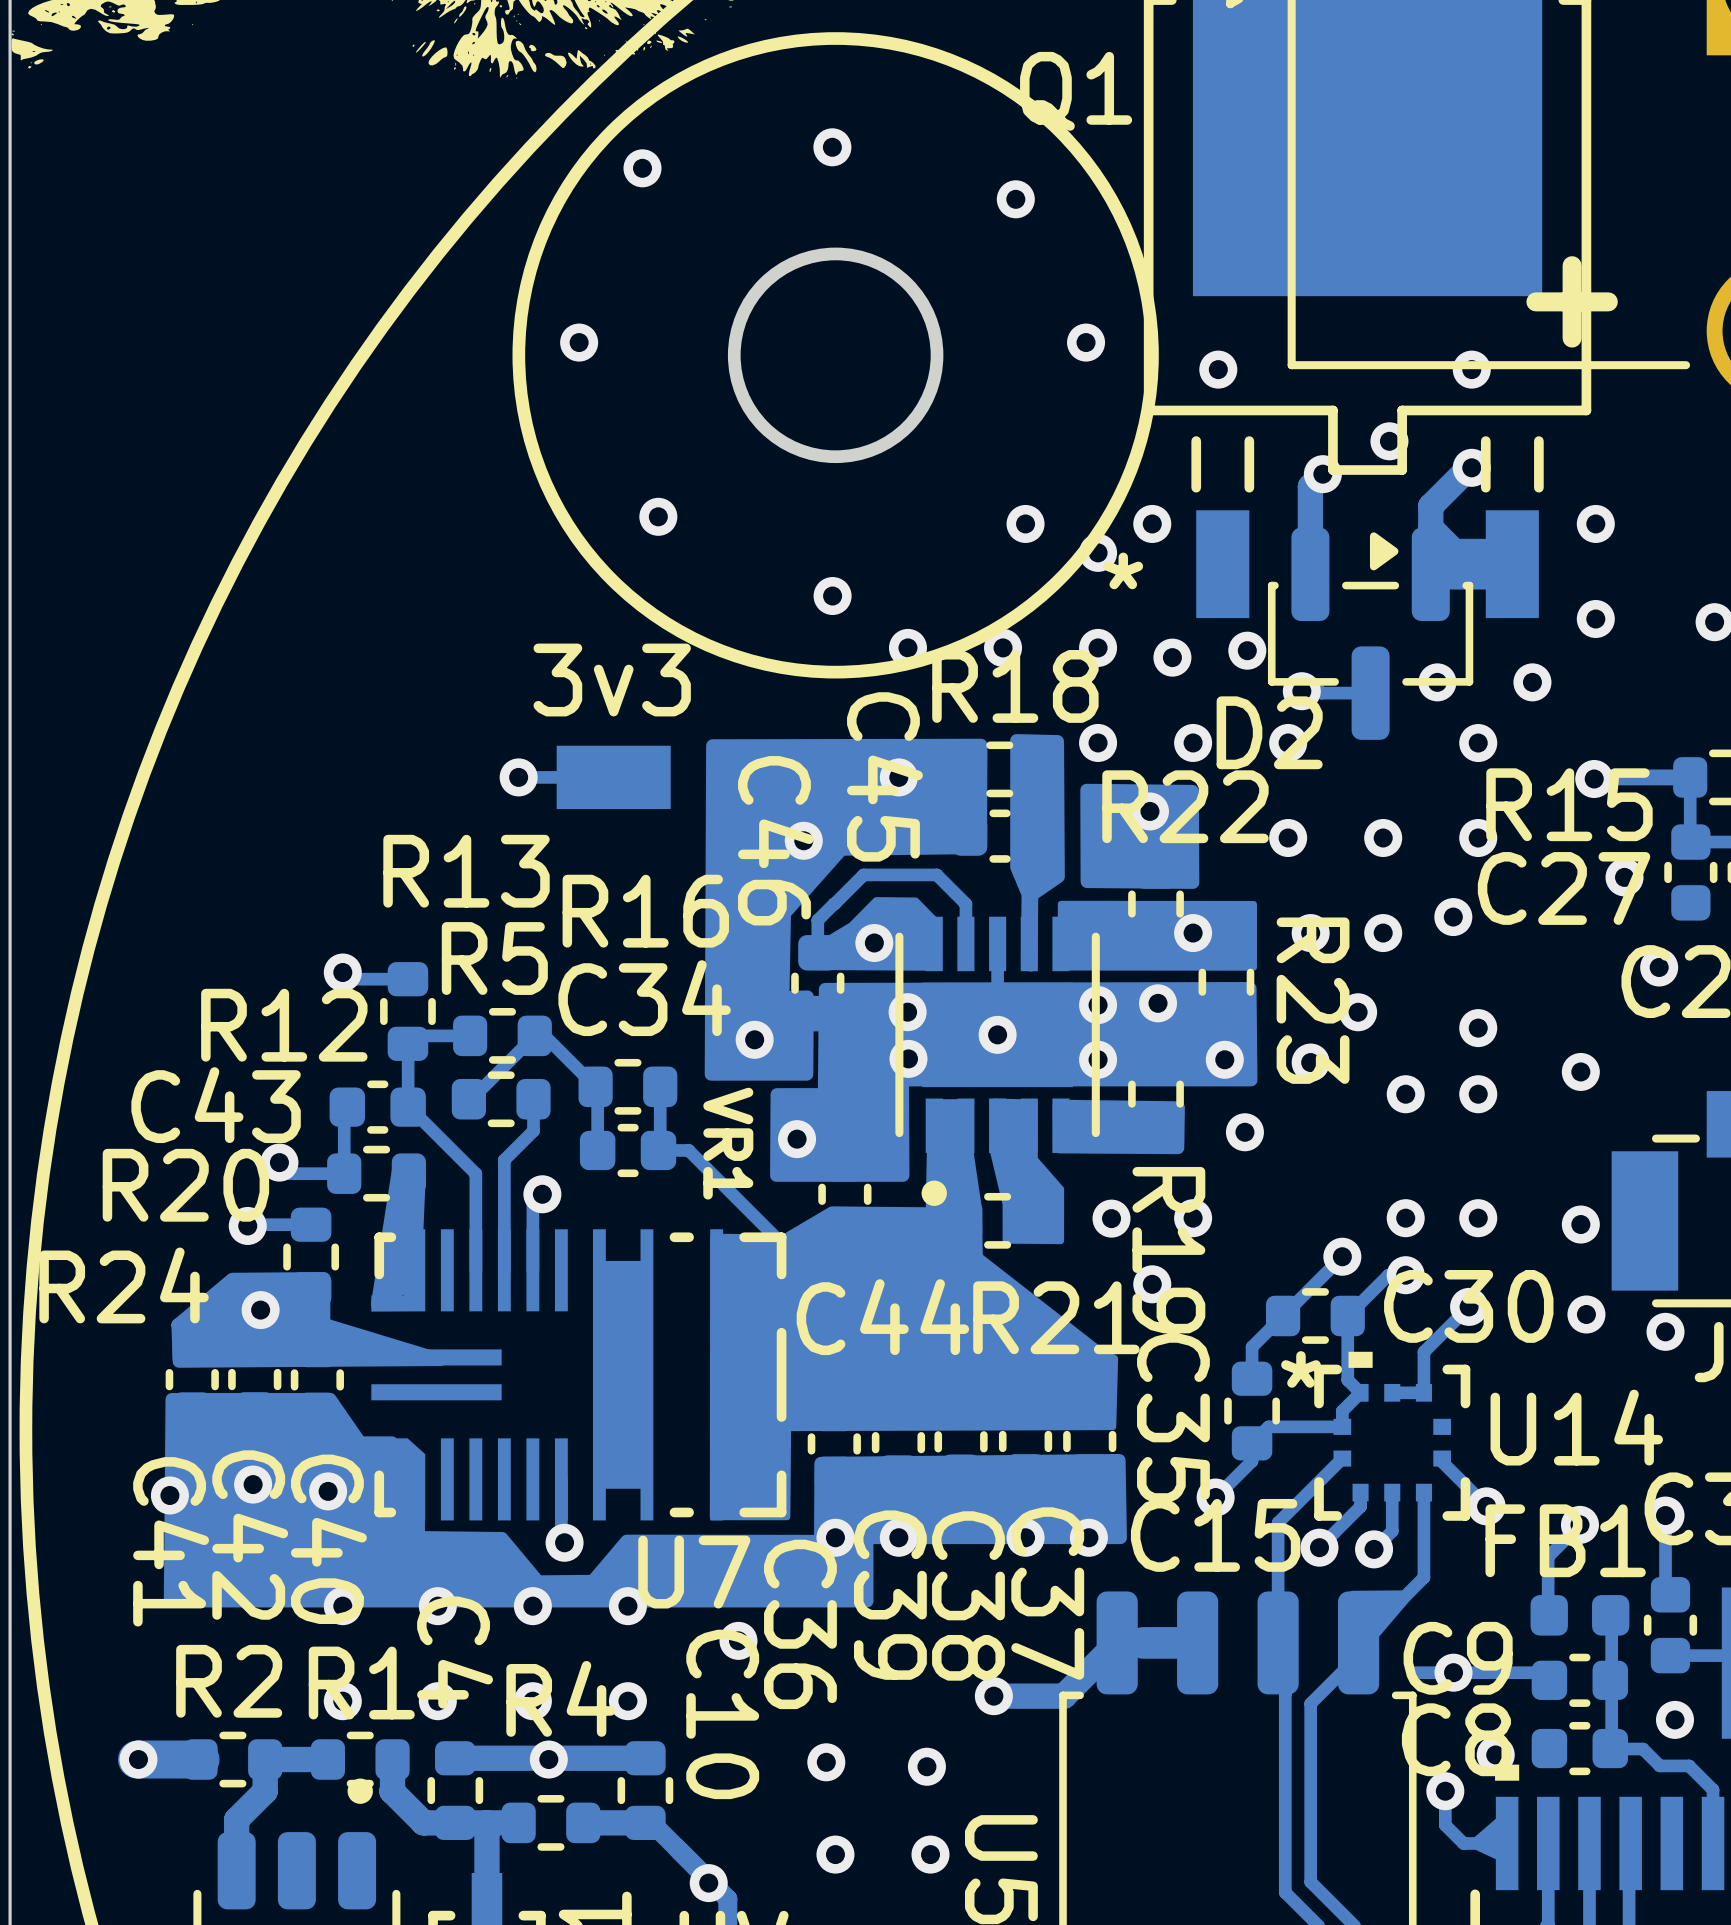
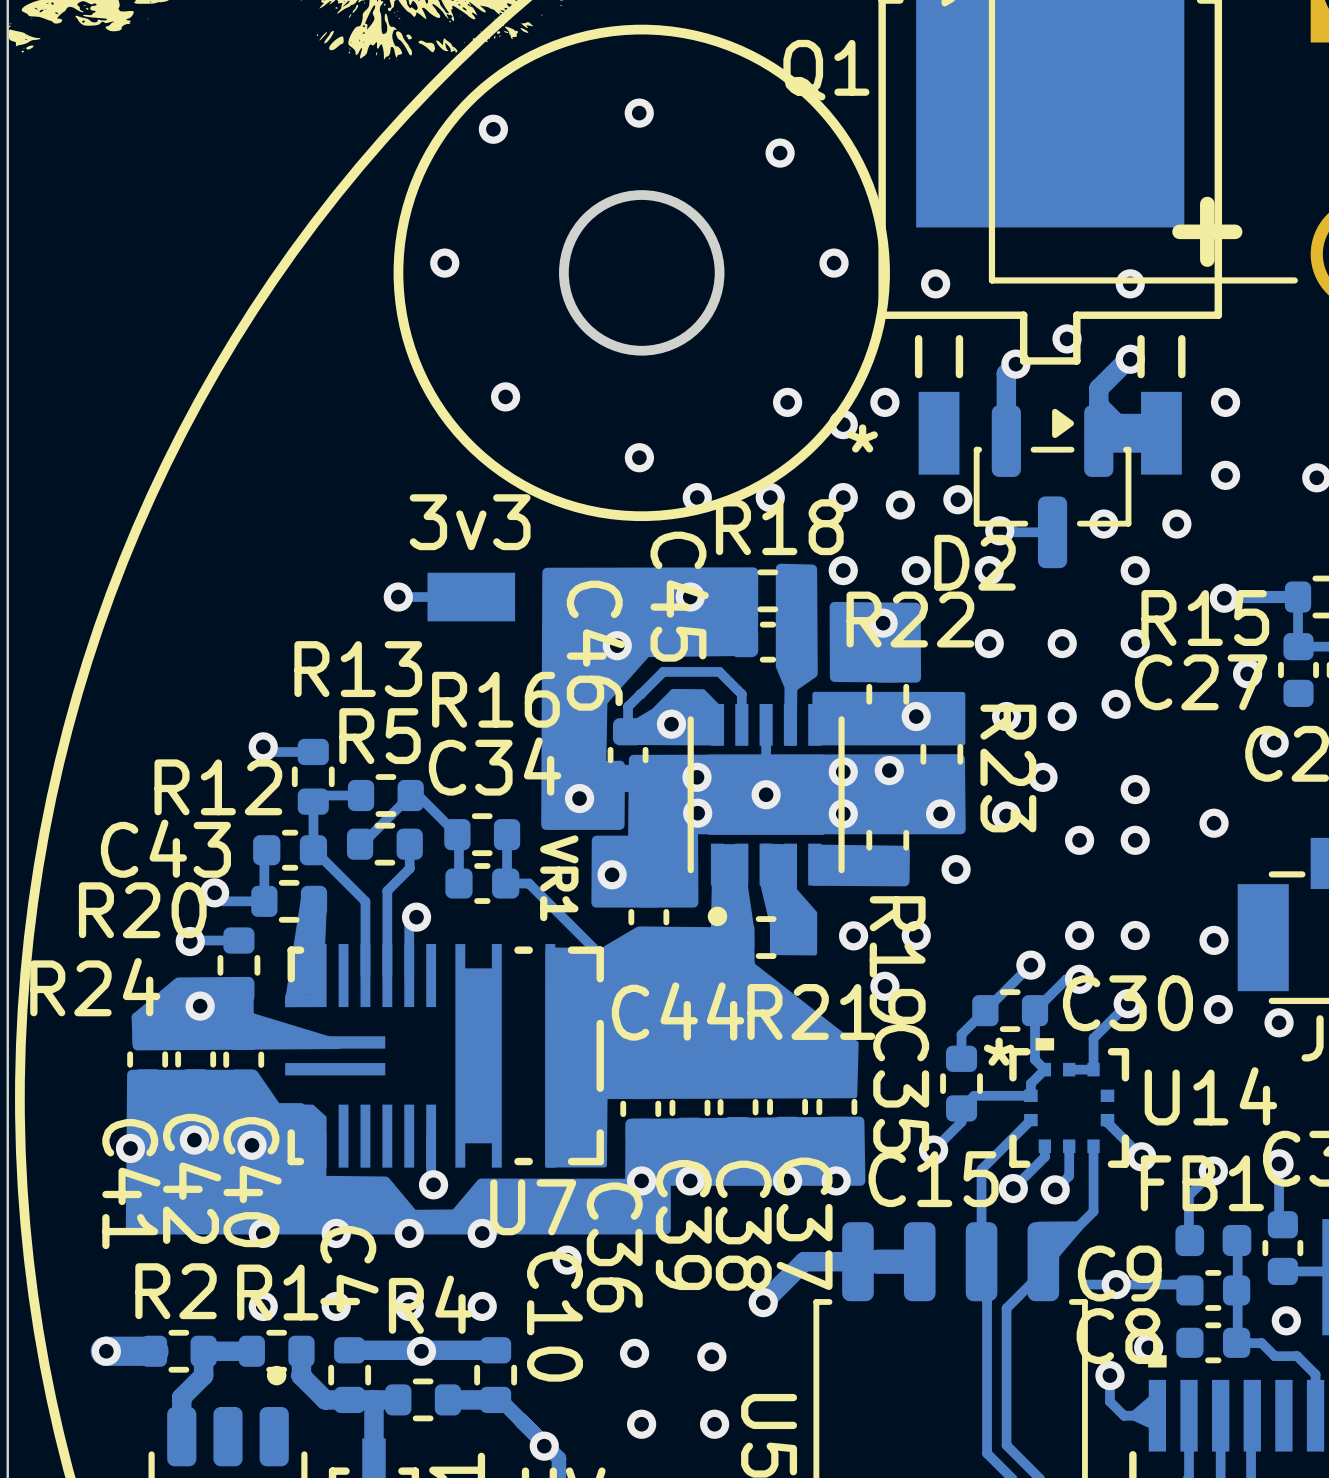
track: (1117, 1642) (1063, 1696) (993, 1696) -> (857, 1261) (804, 1261) (763, 1302)

